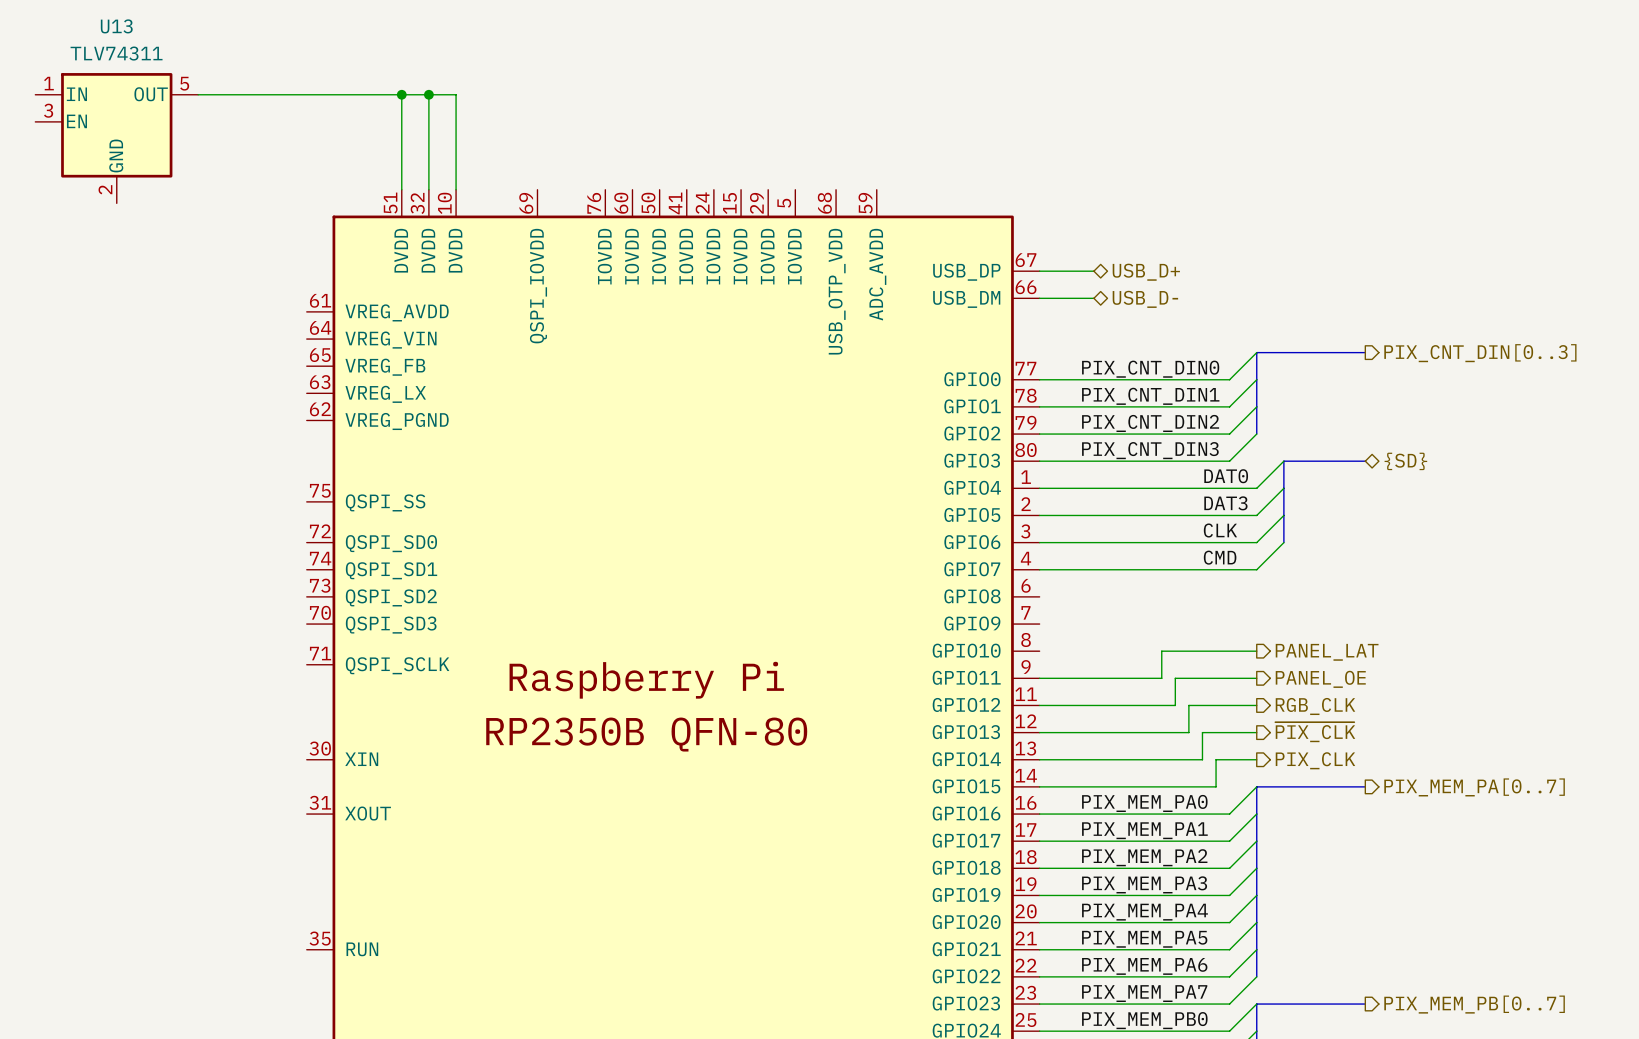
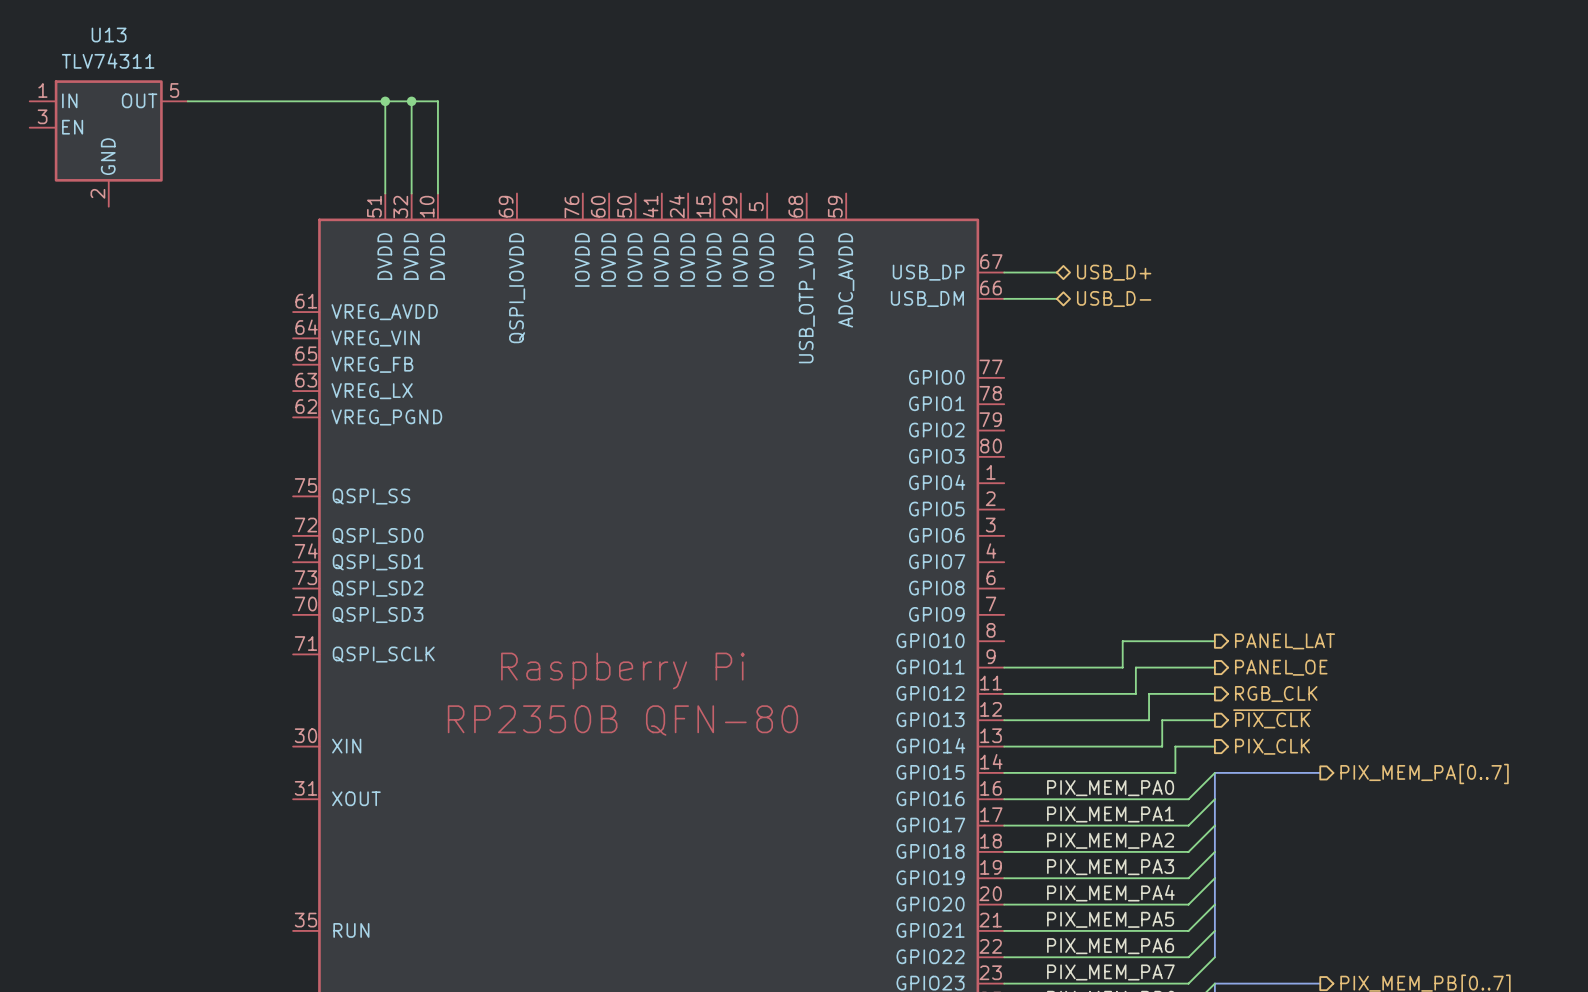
wire: (1256, 352) (1229, 379) (1039, 379) -> none
bus: (1365, 352) (1256, 352) (1256, 434) -> none
hierarchical label: PIX_CNT_DIN[0..3] (1480, 353) -> none
label: PIX_CNT_DIN0 (1150, 369) -> none
wire: (1256, 379) (1229, 406) (1039, 406) -> none
label: PIX_CNT_DIN1 (1150, 396) -> none
wire: (1256, 406) (1229, 434) (1039, 434) -> none
label: PIX_CNT_DIN2 (1150, 423) -> none
wire: (1256, 434) (1229, 461) (1039, 461) -> none
label: PIX_CNT_DIN3 (1150, 450) -> none
wire: (1283, 461) (1256, 488) (1039, 488) -> none
bus: (1365, 461) (1283, 461) (1283, 542) -> none
hierarchical label: {SD} (1405, 461) -> none
label: DAT0 (1226, 476) -> none
wire: (1283, 488) (1256, 515) (1039, 515) -> none
label: DAT3 (1225, 503) -> none
wire: (1283, 515) (1256, 542) (1039, 542) -> none
label: CLK (1220, 530) -> none
wire: (1283, 542) (1256, 569) (1039, 569) -> none
label: CMD (1220, 557) -> none

